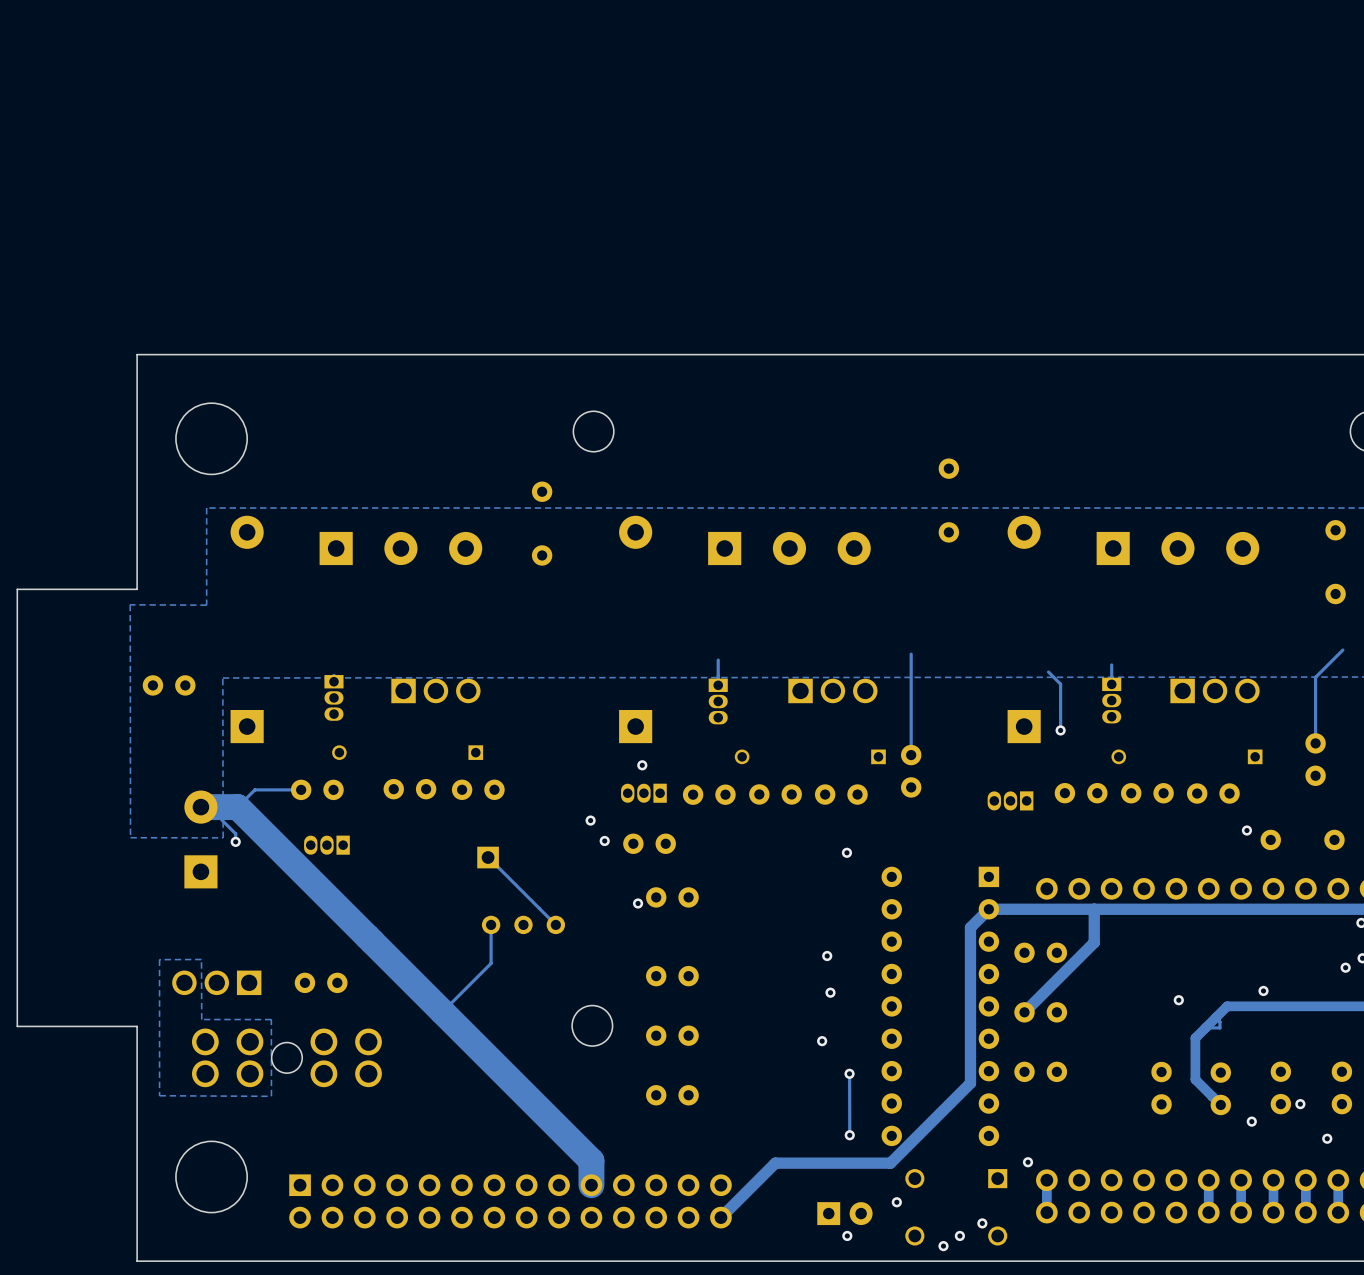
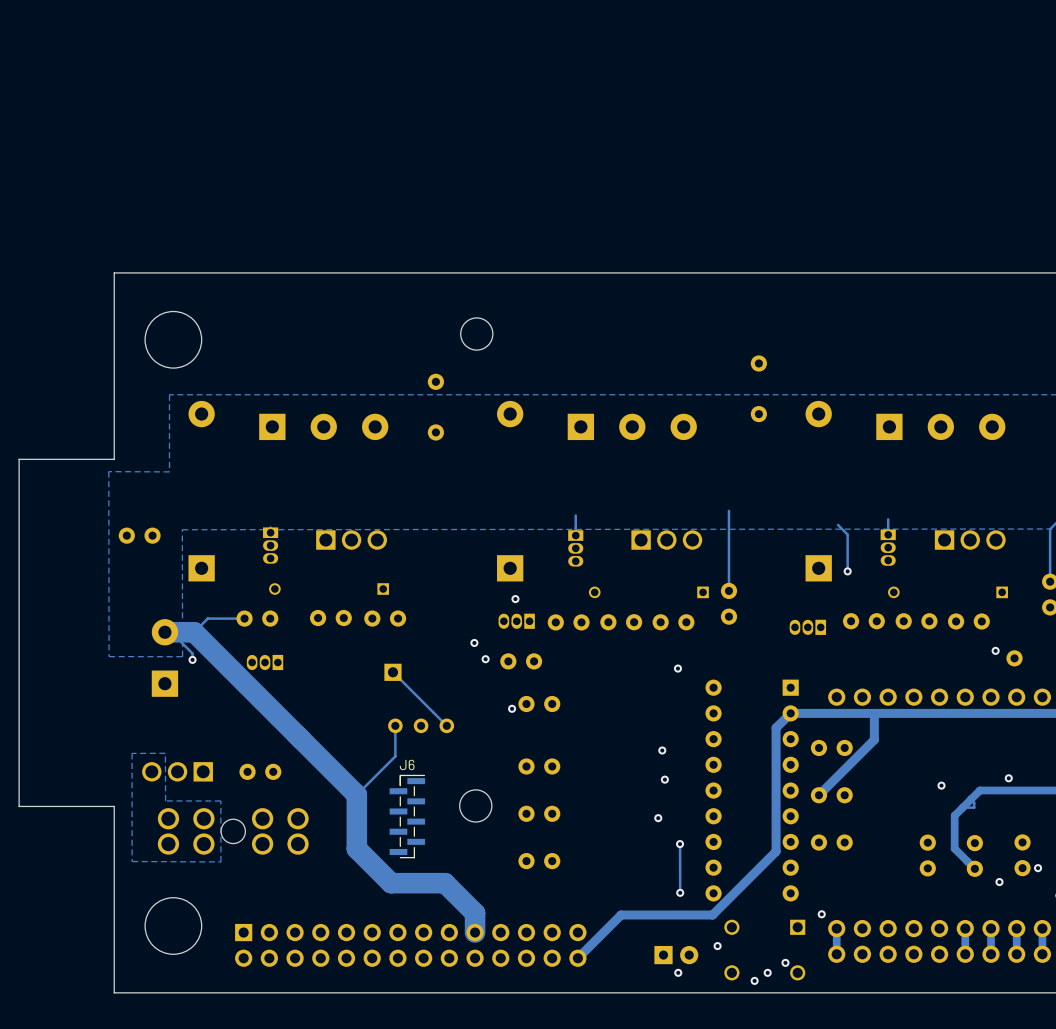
track: (442, 1011) (553, 1123) -> (356, 794) (356, 848) (391, 883) (445, 883)
J6: none -> (407, 816)

